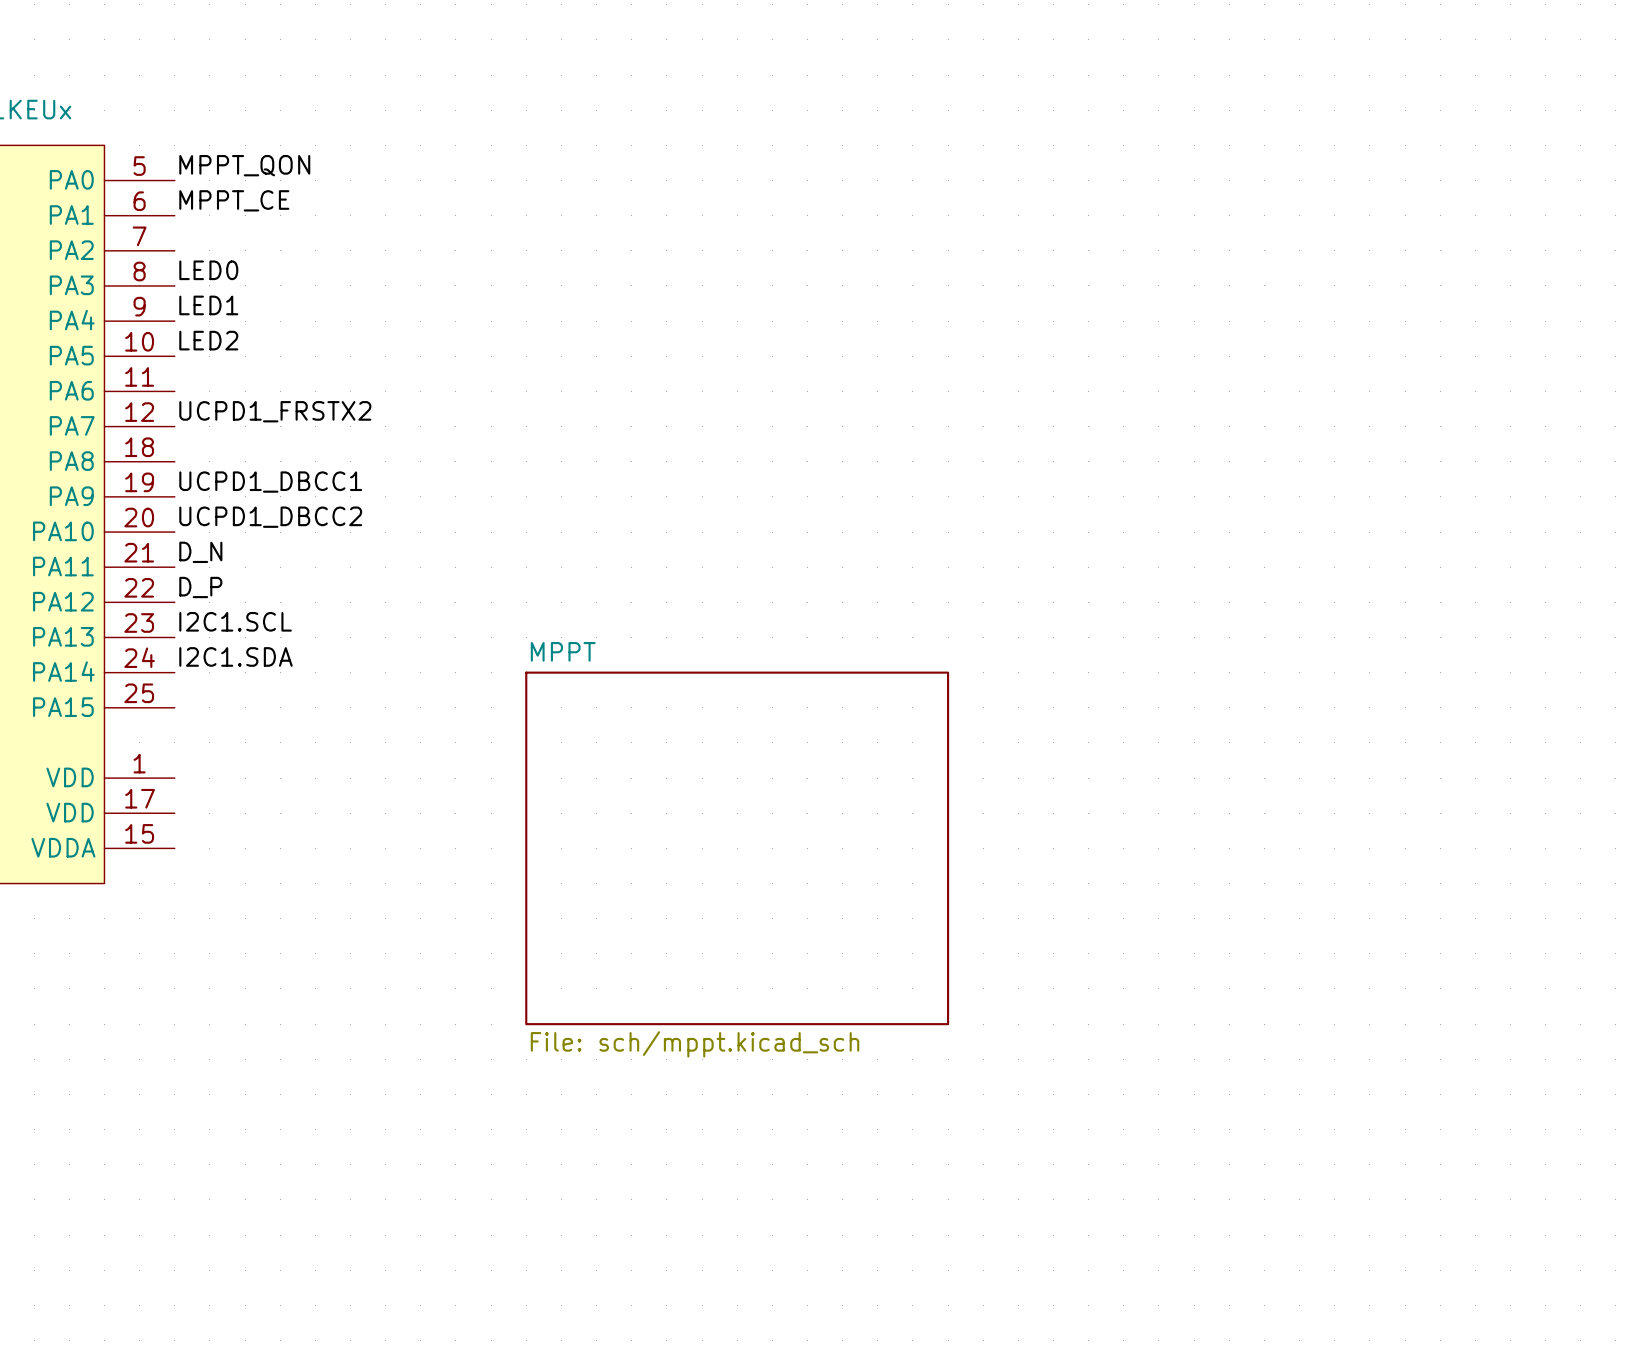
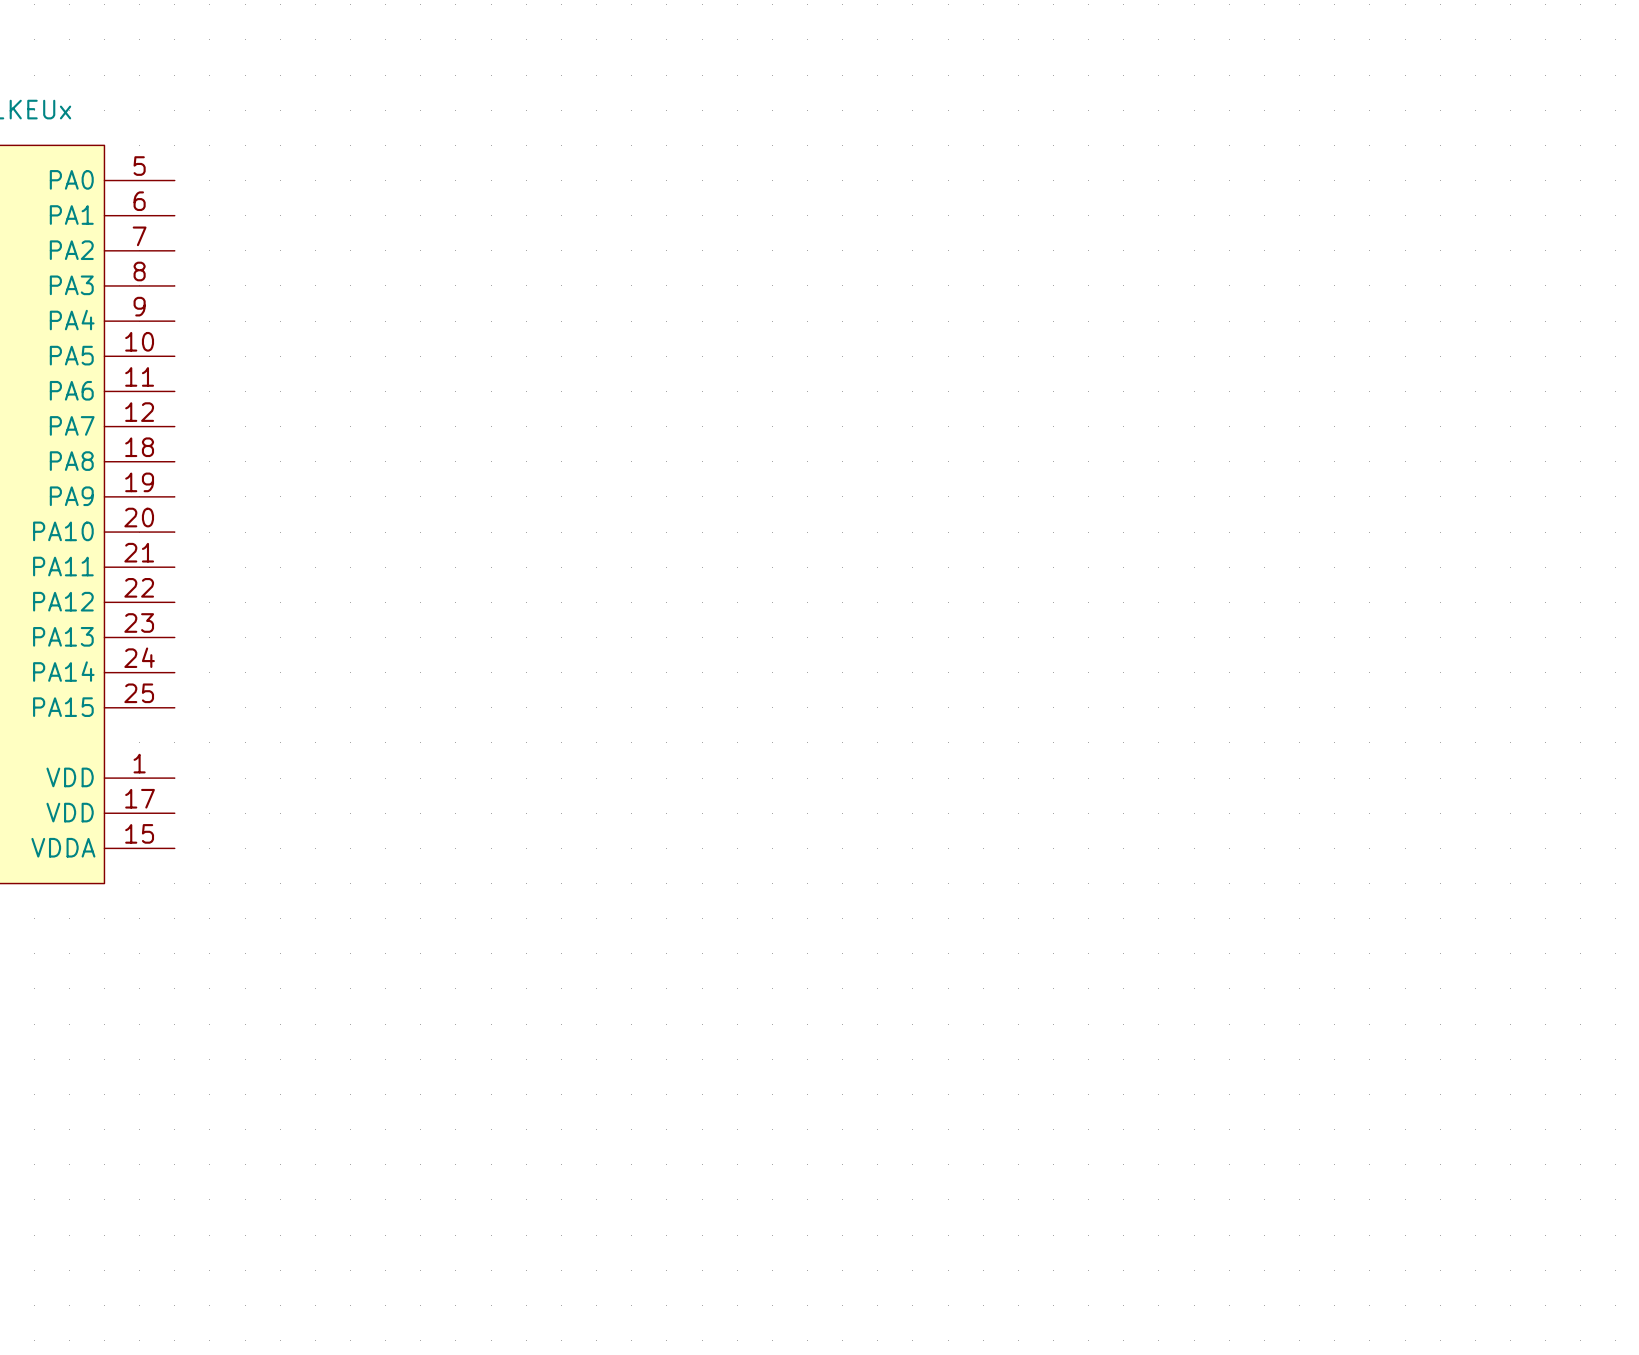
label: MPPT_QON (244, 165) -> none
label: MPPT_CE (234, 200) -> none
label: LED0 (208, 270) -> none
label: LED1 (208, 305) -> none
label: LED2 (208, 340) -> none
label: UCPD1_FRSTX2 (275, 411) -> none
label: UCPD1_DBCC1 (270, 482) -> none
label: UCPD1_DBCC2 (270, 517) -> none
label: D_N (200, 552) -> none
label: D_P (200, 587) -> none
label: I2C1.SCL (235, 621) -> none
label: I2C1.SDA (235, 656) -> none
sheet MPPT: File: sch/mppt.kicad_sch (737, 848) -> none

